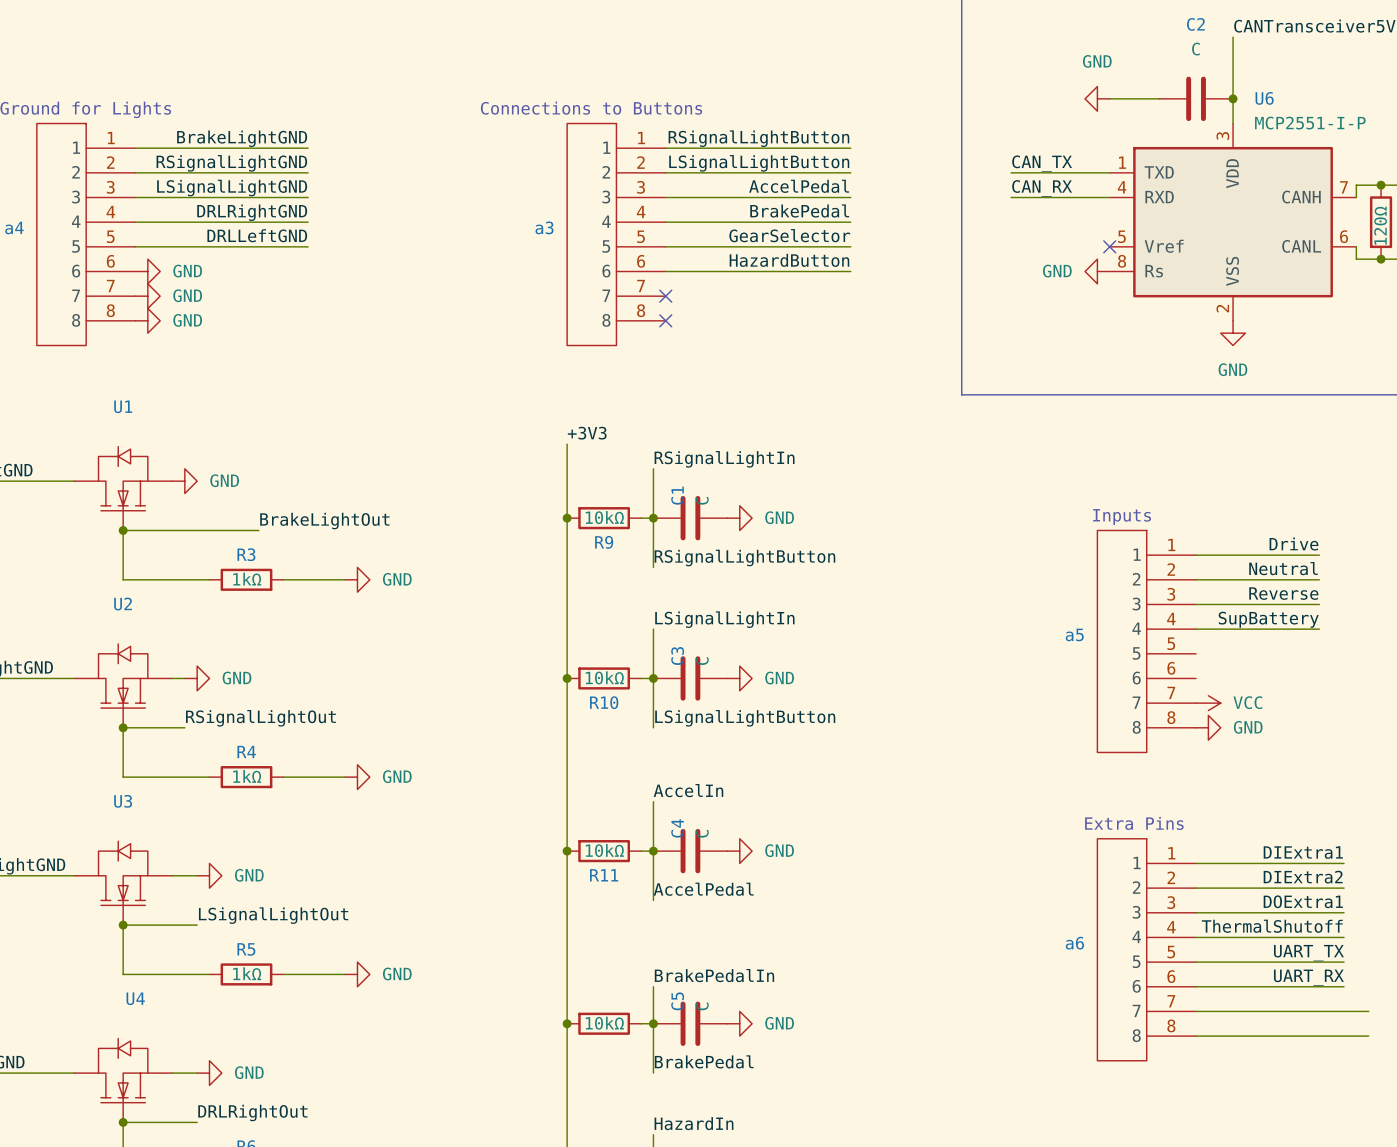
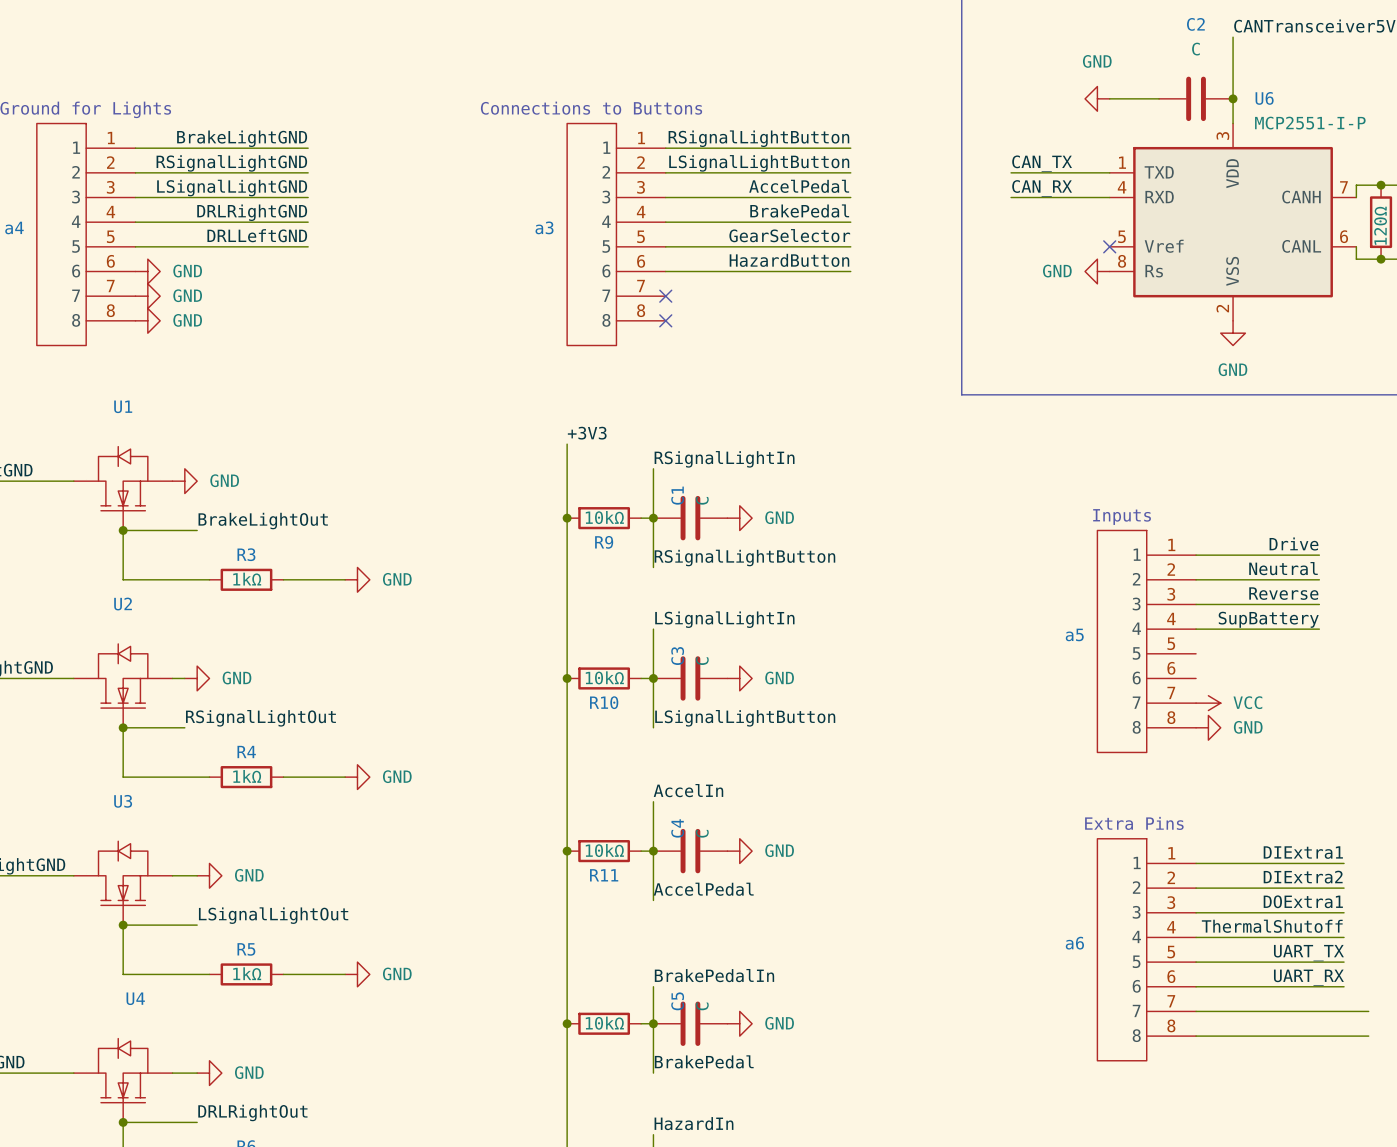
label position: BrakeLightOut (324, 521) -> BrakeLightOut (263, 521)
wire: (197, 530) (258, 530) -> none

